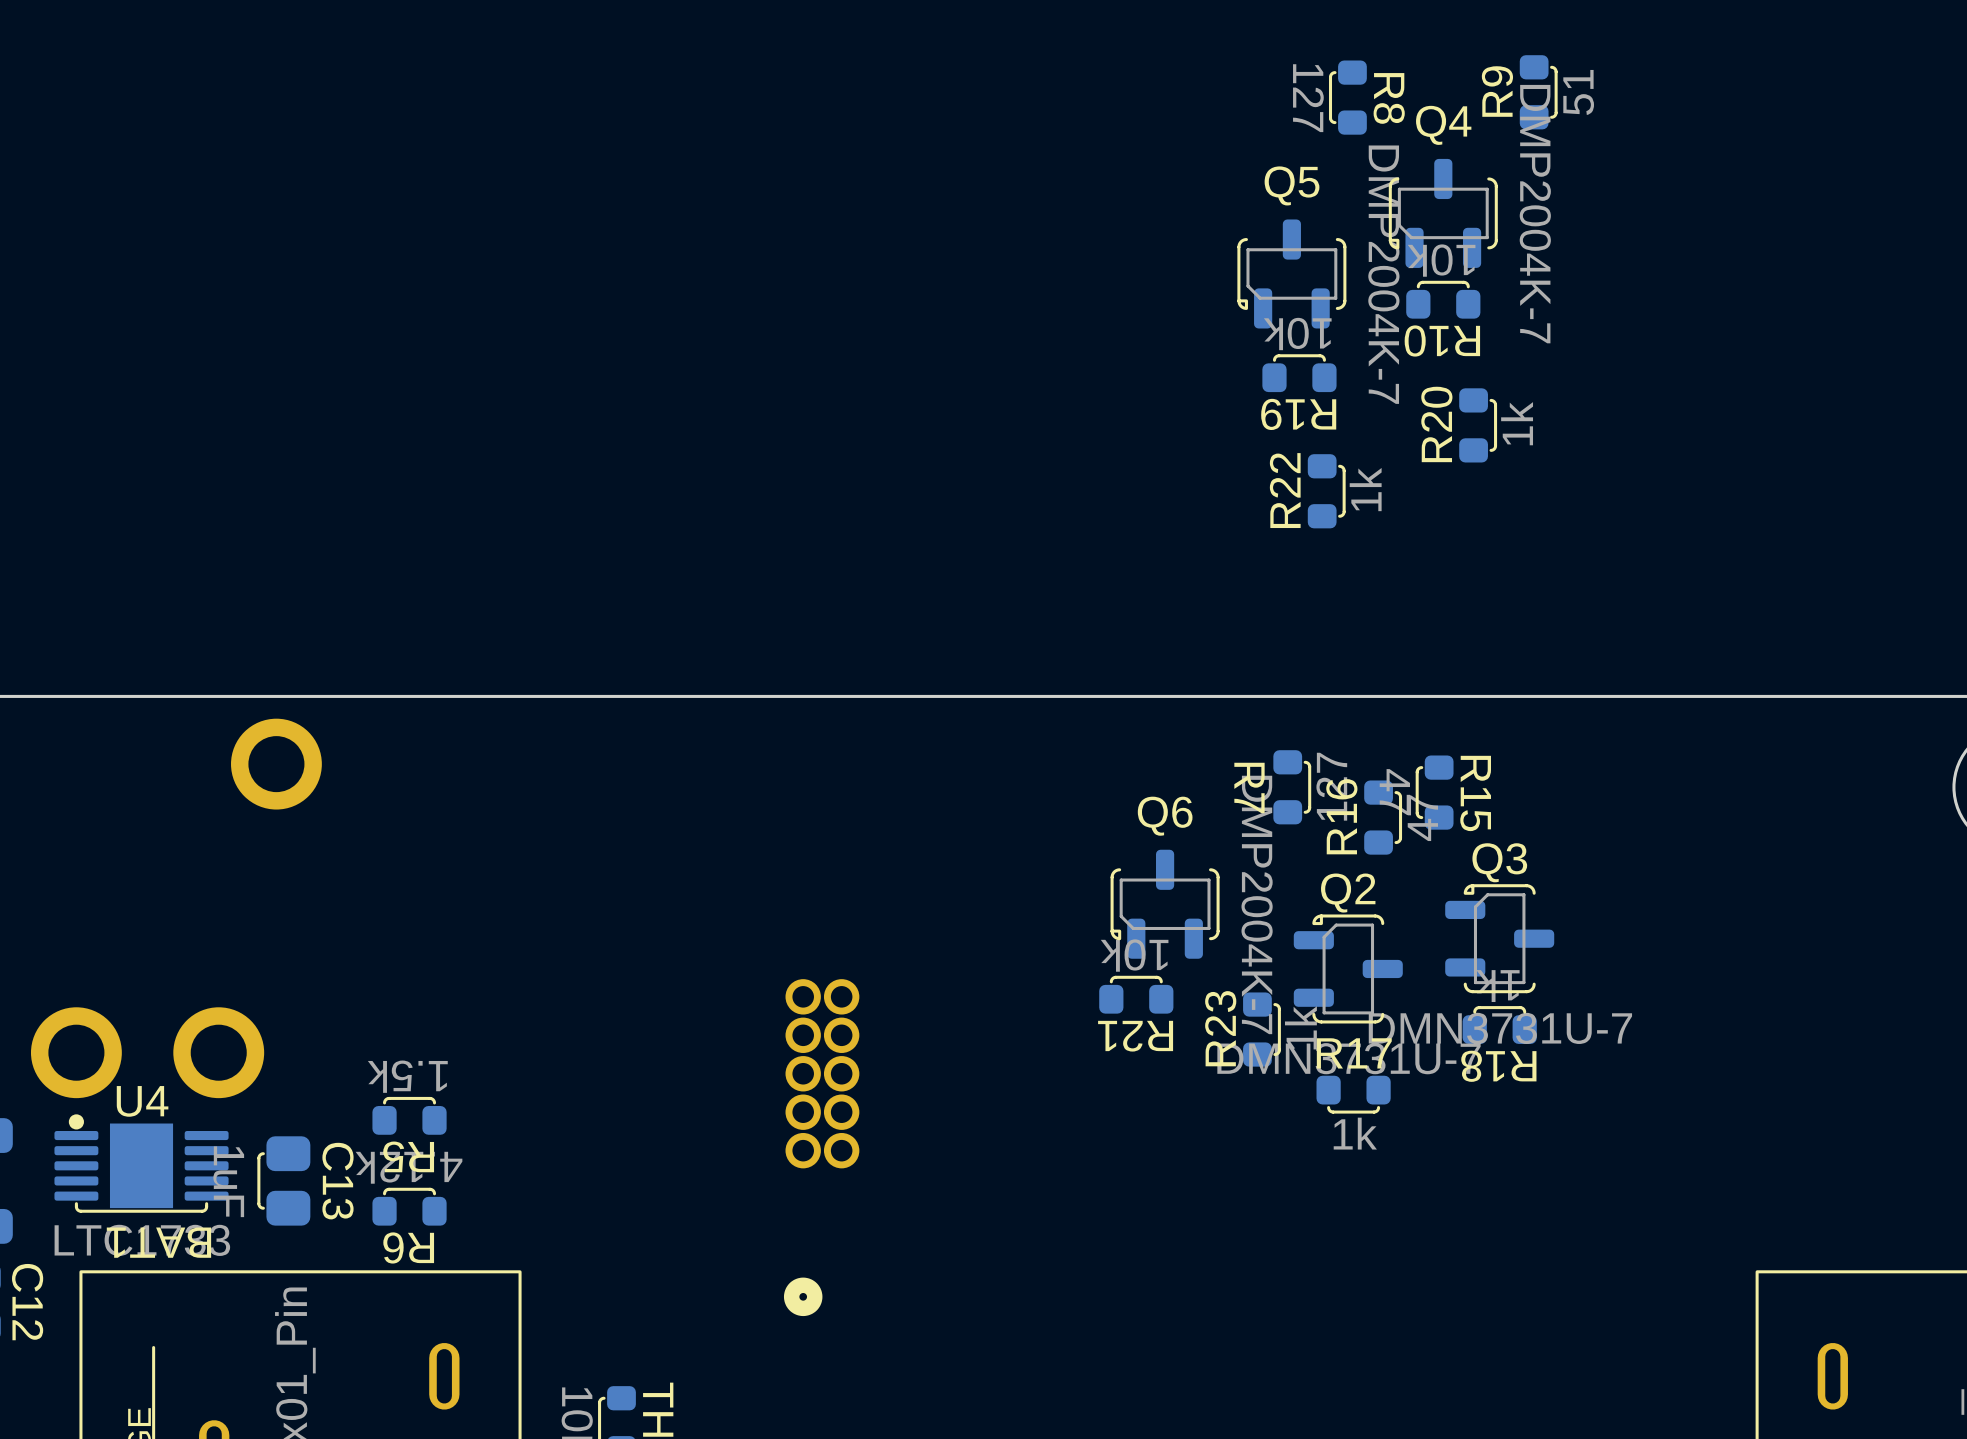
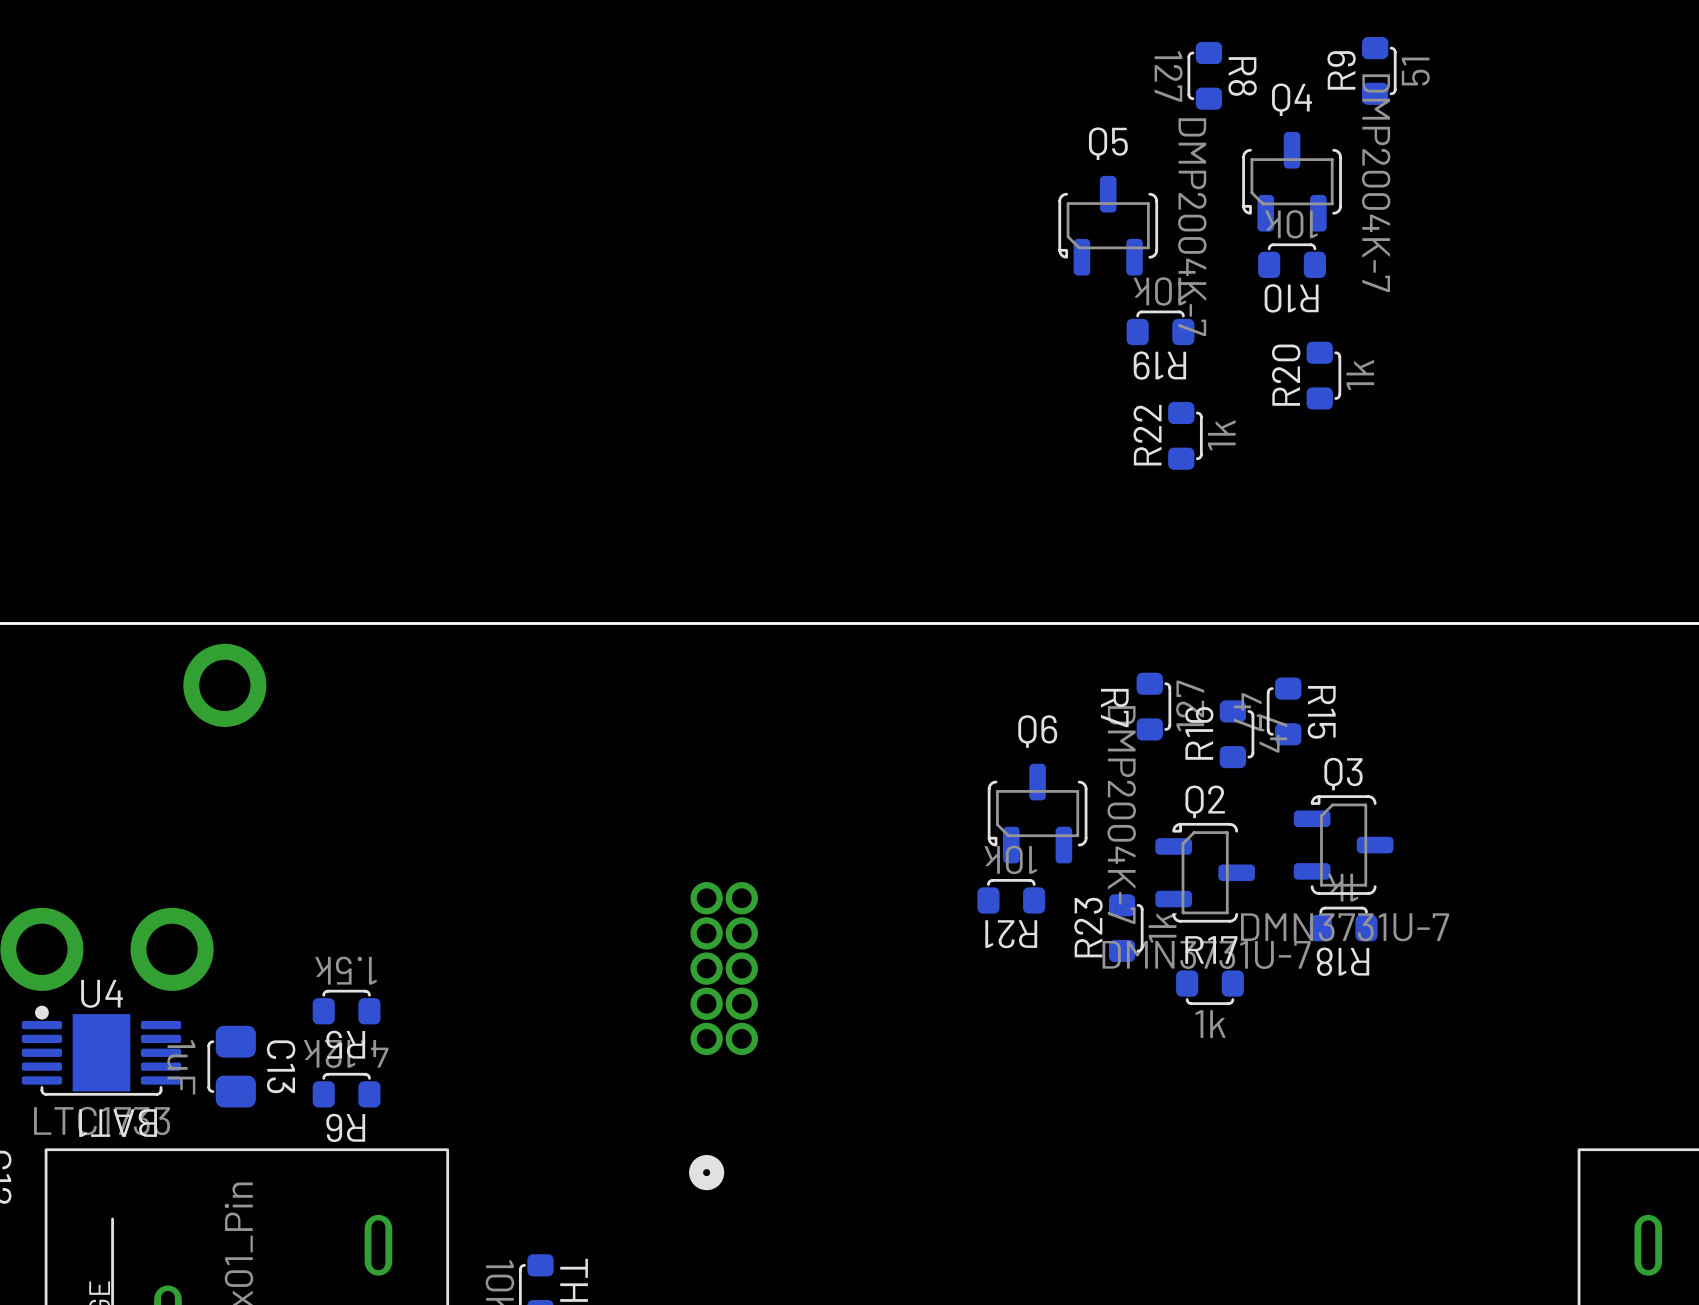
Q5 position: (1291, 273) -> (1108, 225)

